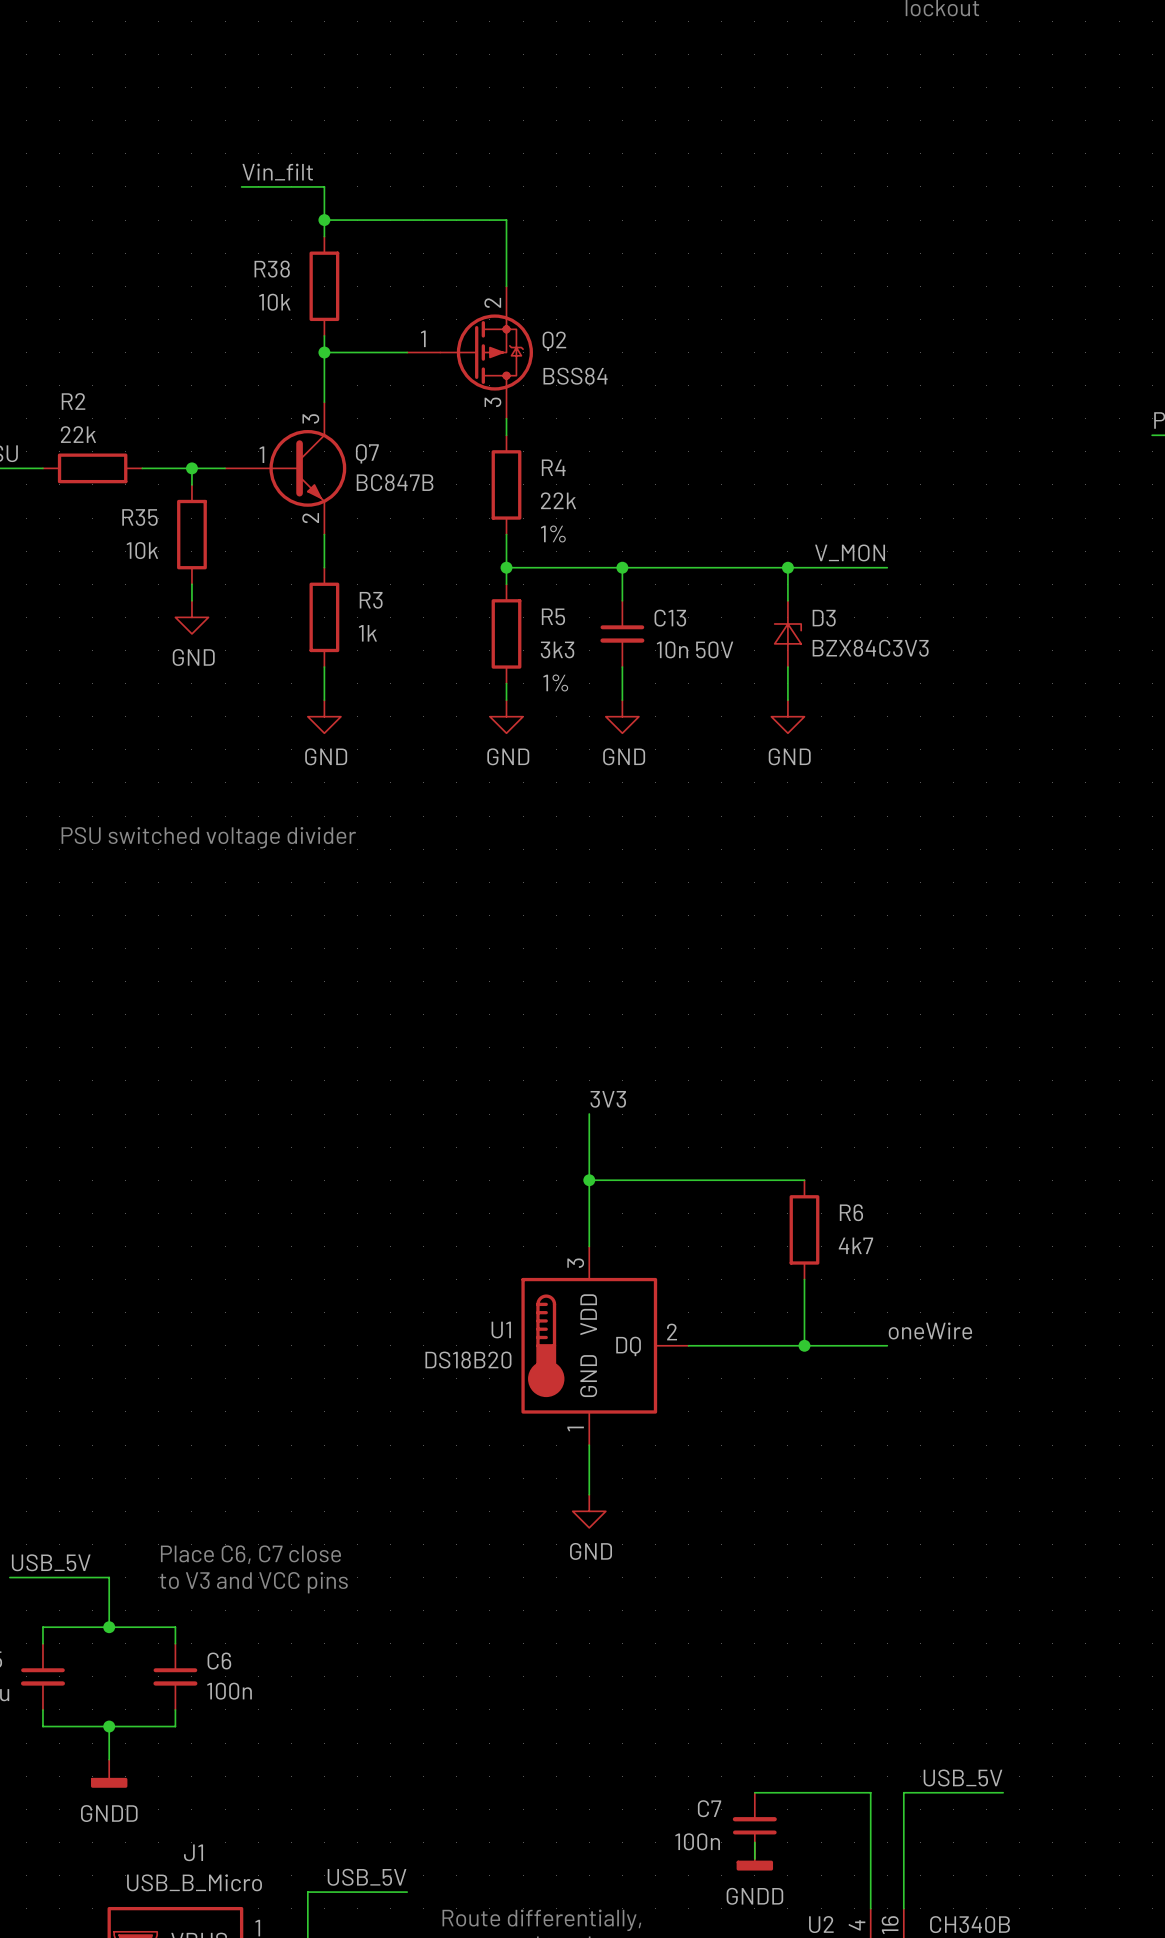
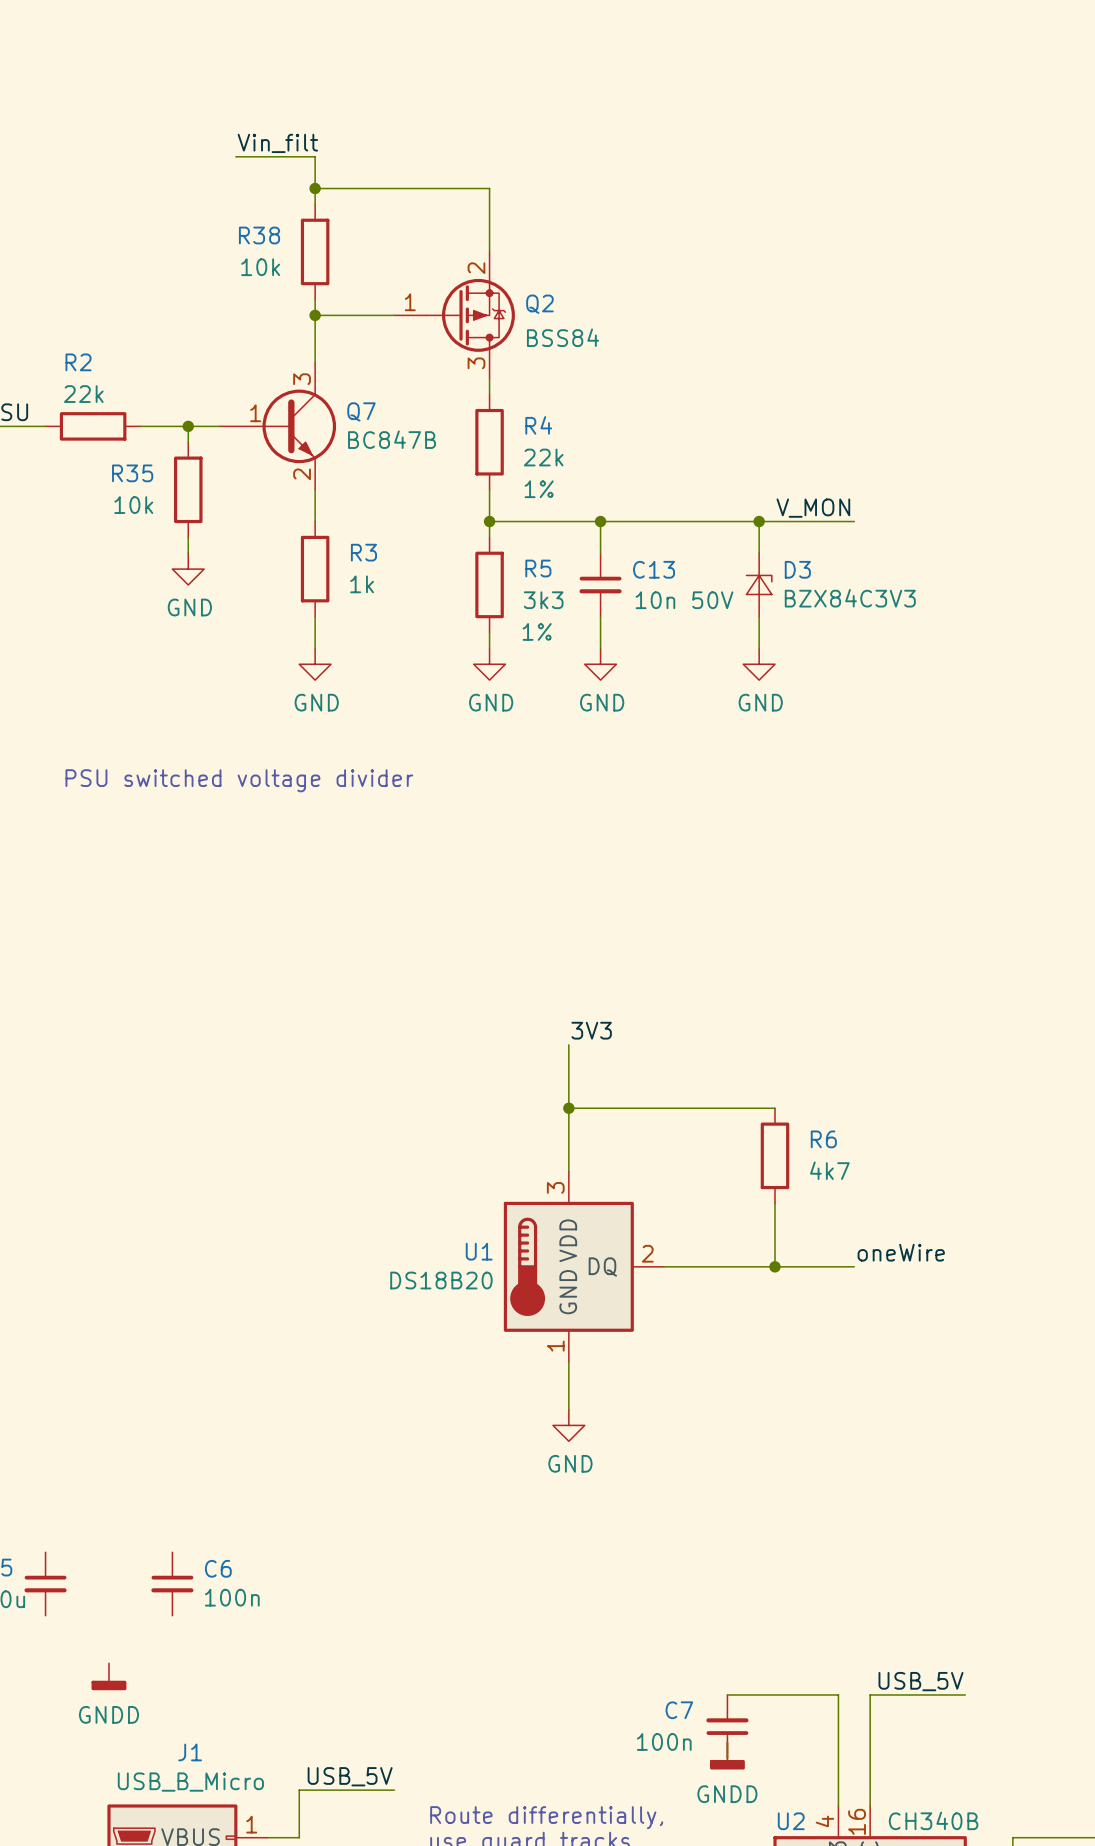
text: Place C6, C7 close (250, 1554) -> none
label: USB_5V (51, 1562) -> none
wire: (9, 1577) (109, 1577) (109, 1627) -> none
text: to V3 and VCC pins (253, 1582) -> none
junction: (109, 1627) -> none
wire: (42, 1643) (42, 1627) (175, 1627) (175, 1643) -> none
wire: (42, 1709) (42, 1726) (175, 1726) (175, 1709) -> none
wire: (109, 1726) (109, 1759) -> none
junction: (109, 1726) -> none

